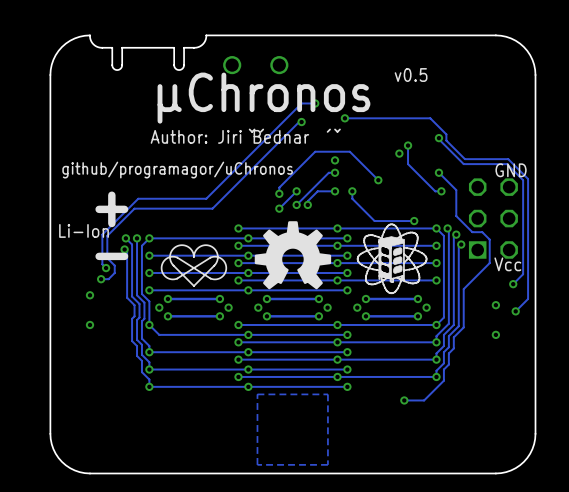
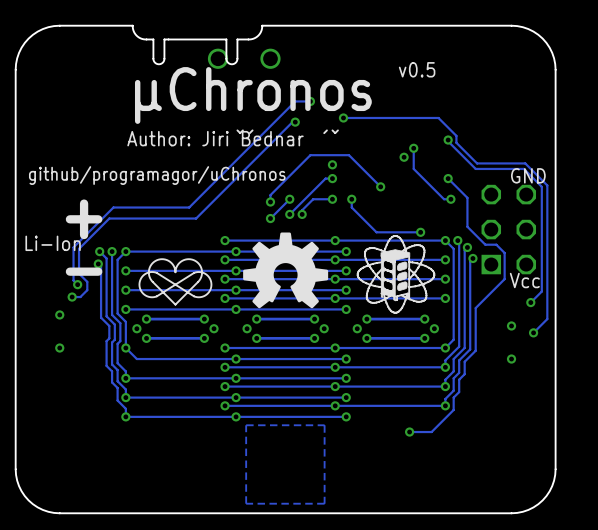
board edge: (89, 35) (91, 40) (95, 46) (112, 47) (112, 65) (116, 70) (122, 66) (122, 47) (167, 47) -> (59, 25) (132, 25) (136, 35) (146, 39)
board edge: (271, 35) (206, 35) (202, 44) (193, 47) -> (262, 25) (261, 31) (255, 37) (237, 39) (237, 59) (232, 64) (226, 60) (226, 39) (175, 39)

